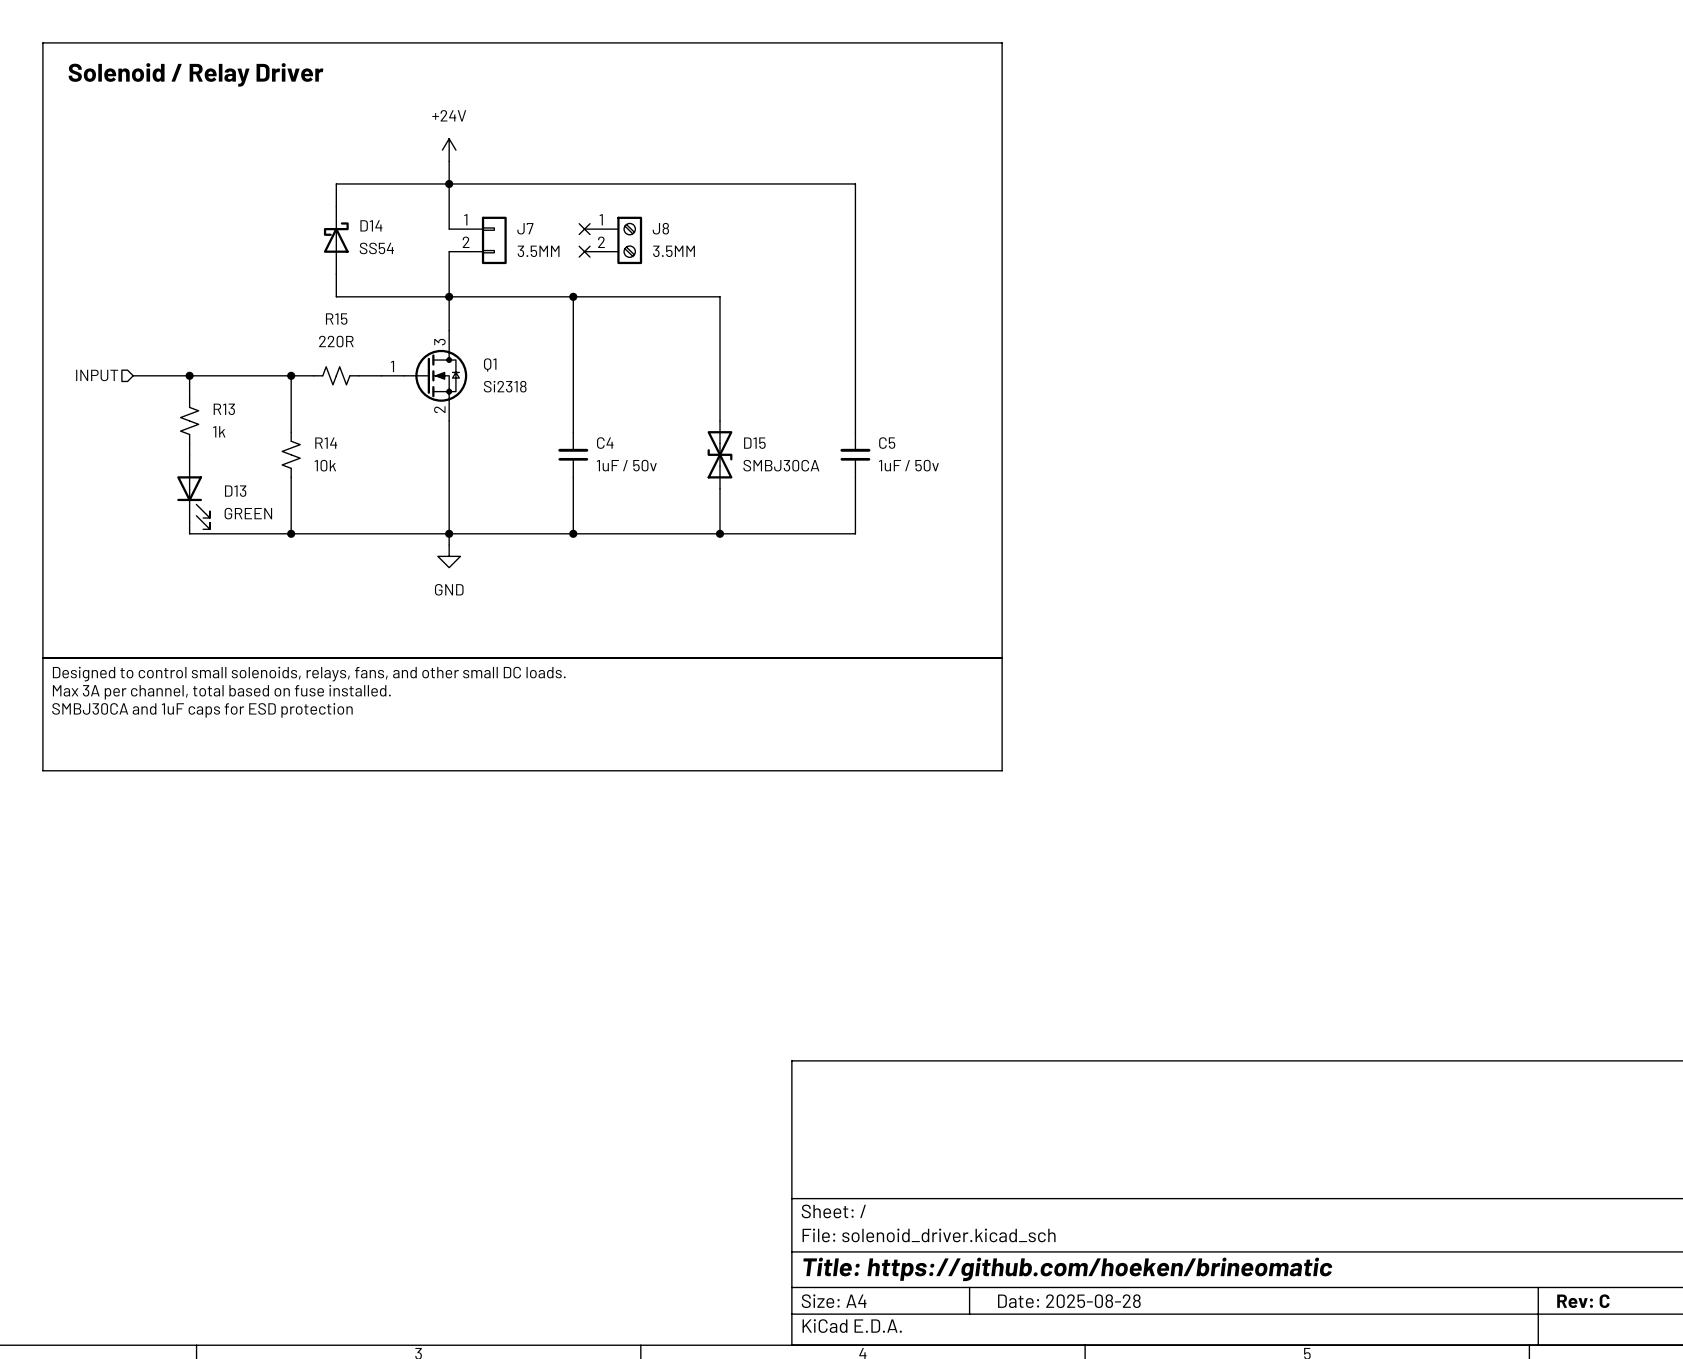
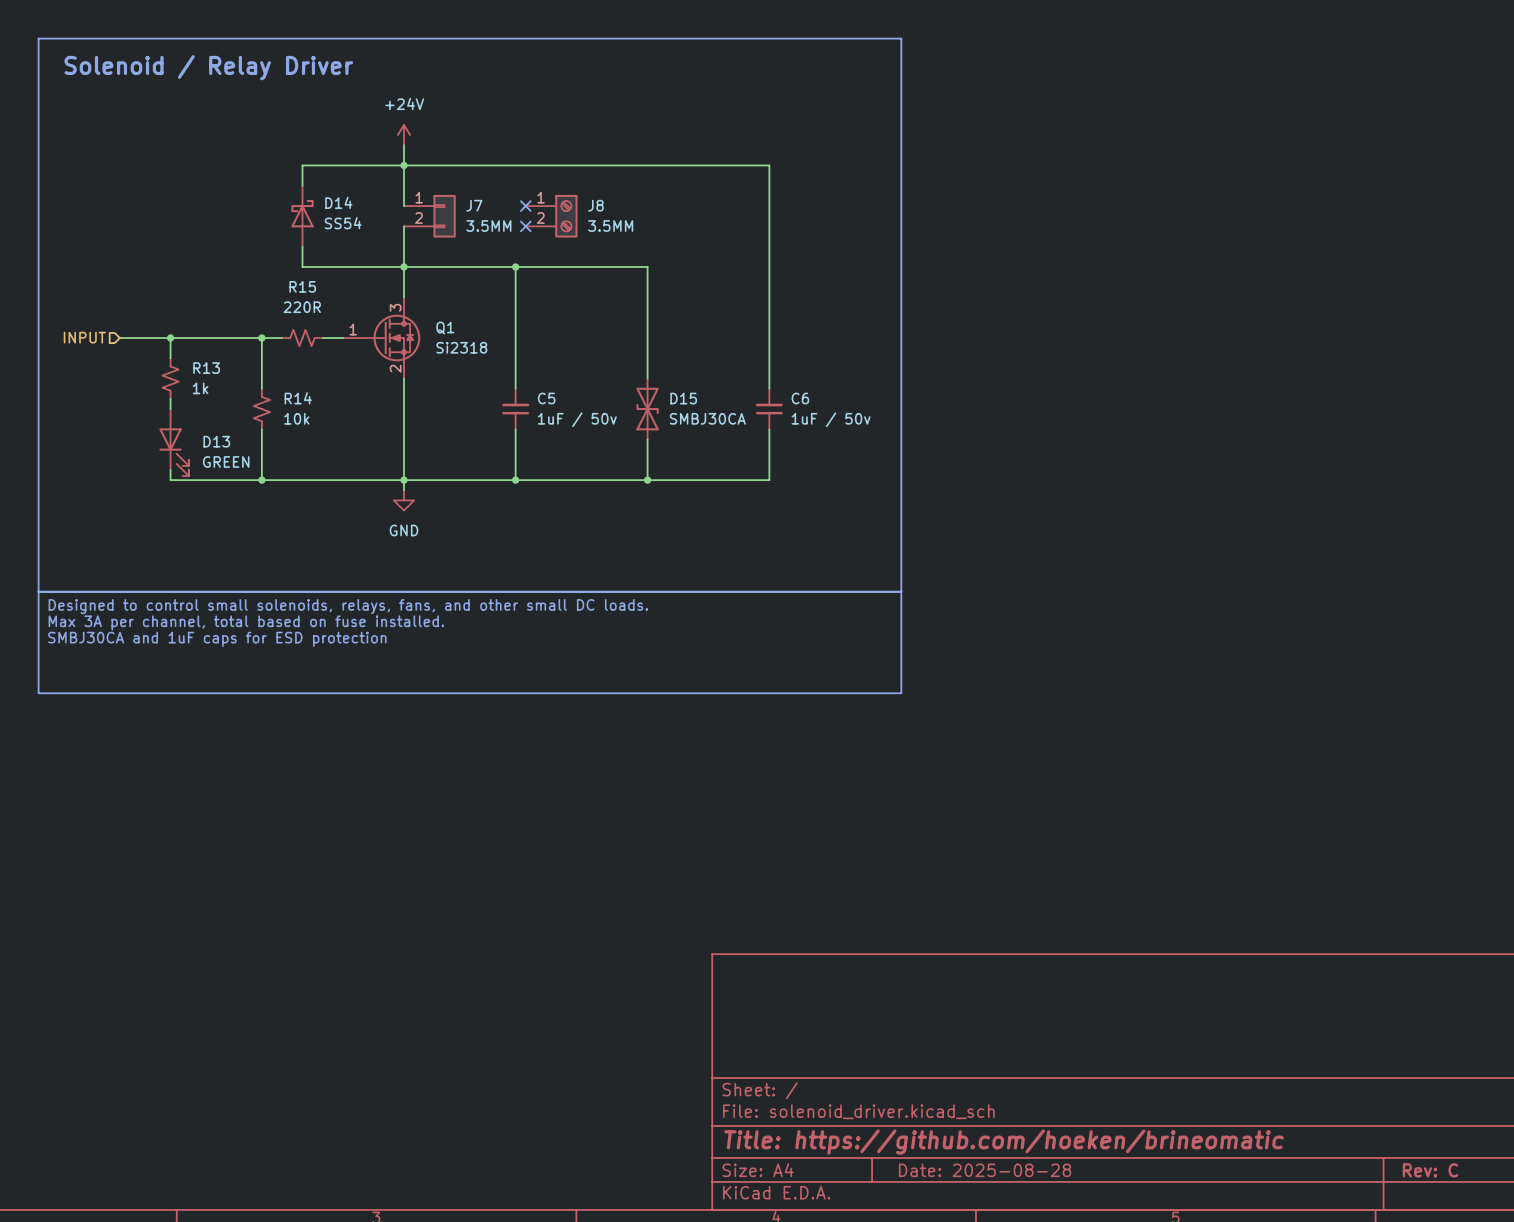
C4 name: C4 (605, 443) -> C5 (546, 398)
C5 name: C5 (887, 443) -> C6 (800, 398)

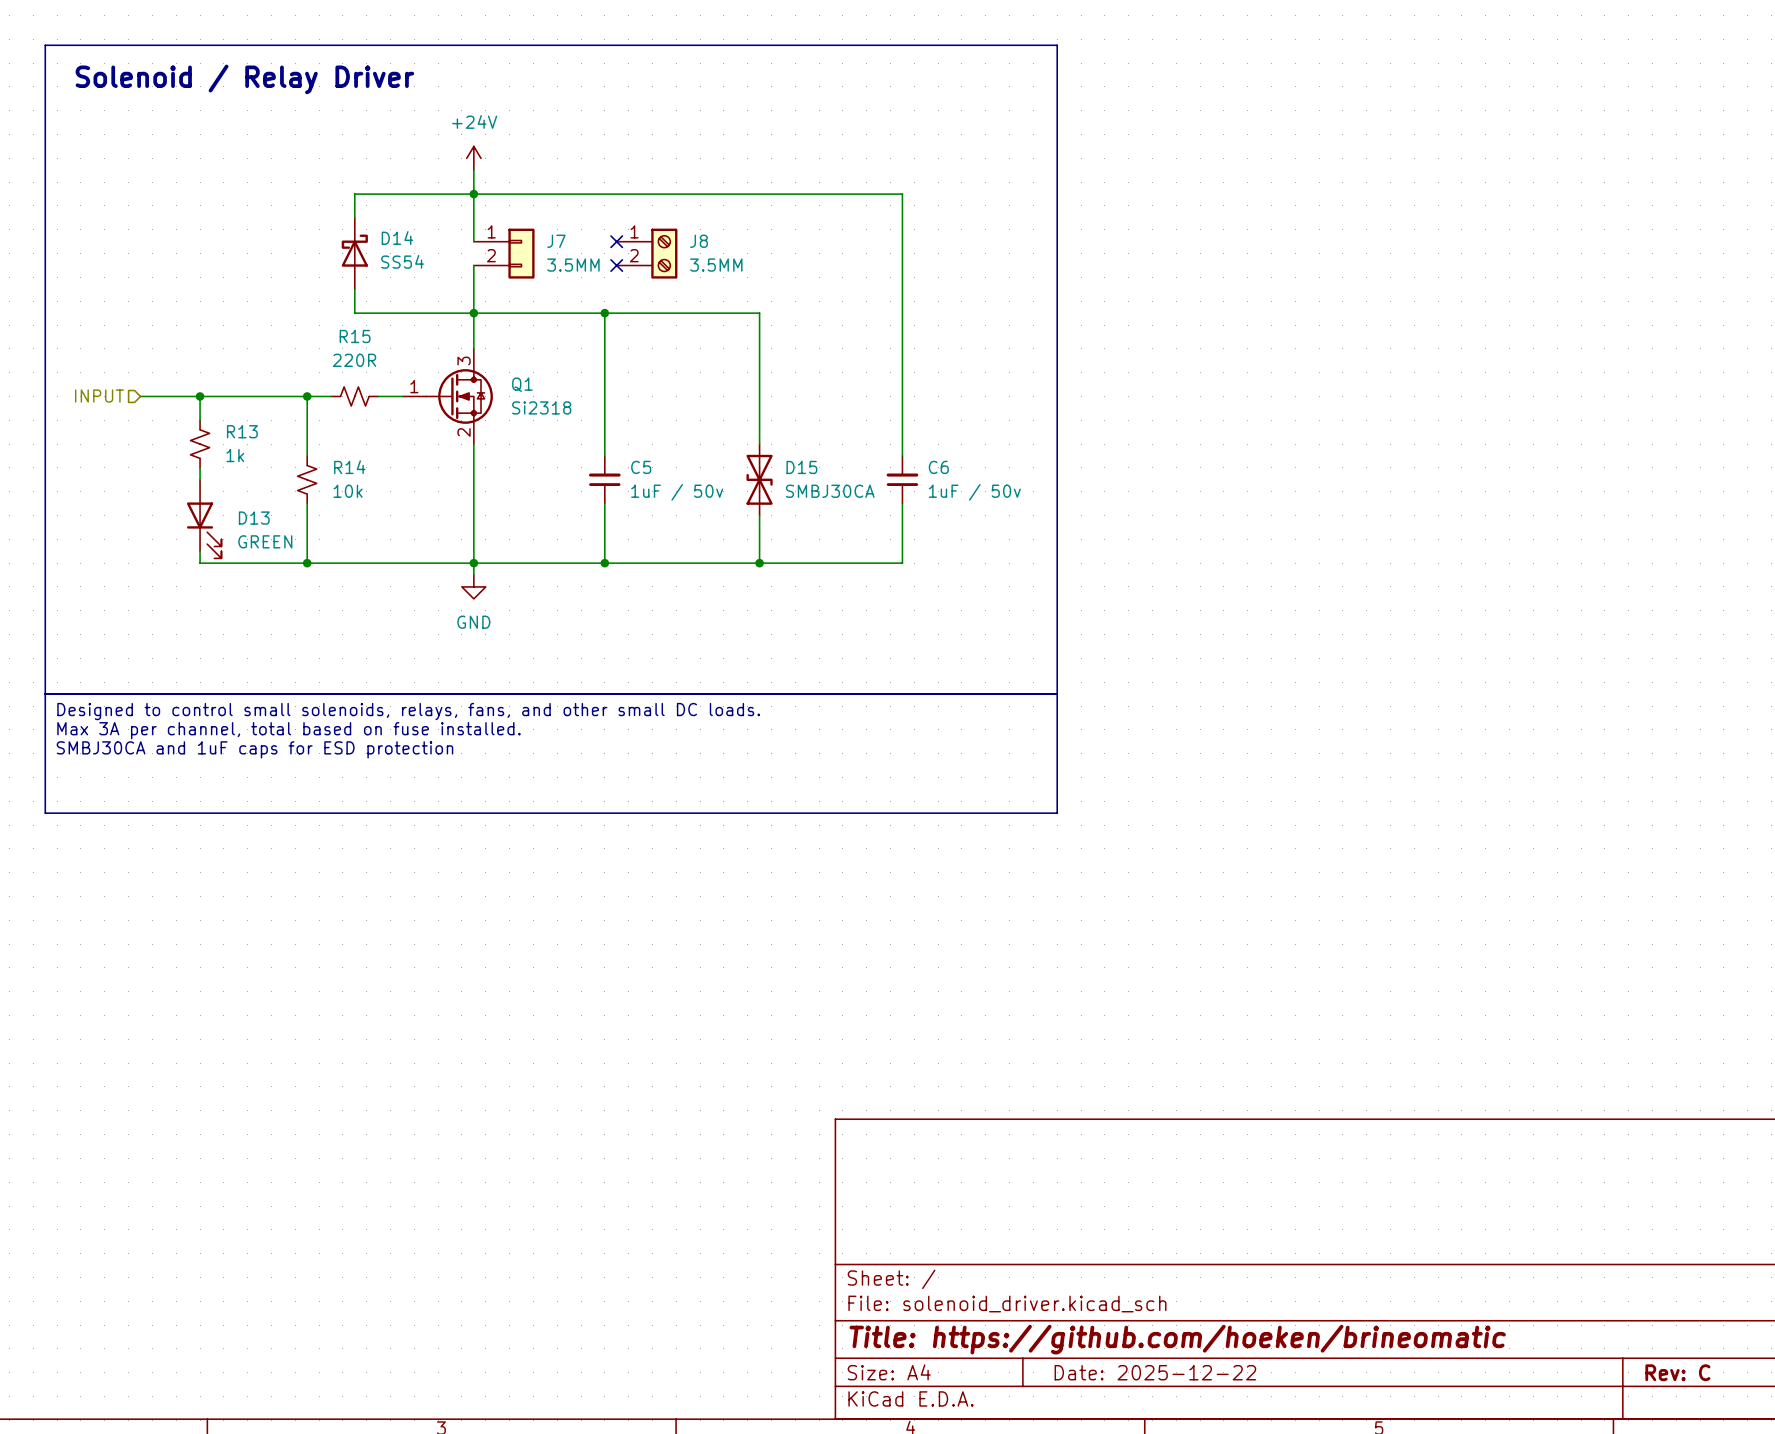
title block: Date: 2025-08-28 (985, 1170) -> Date: 2025-12-22 (1155, 1372)

